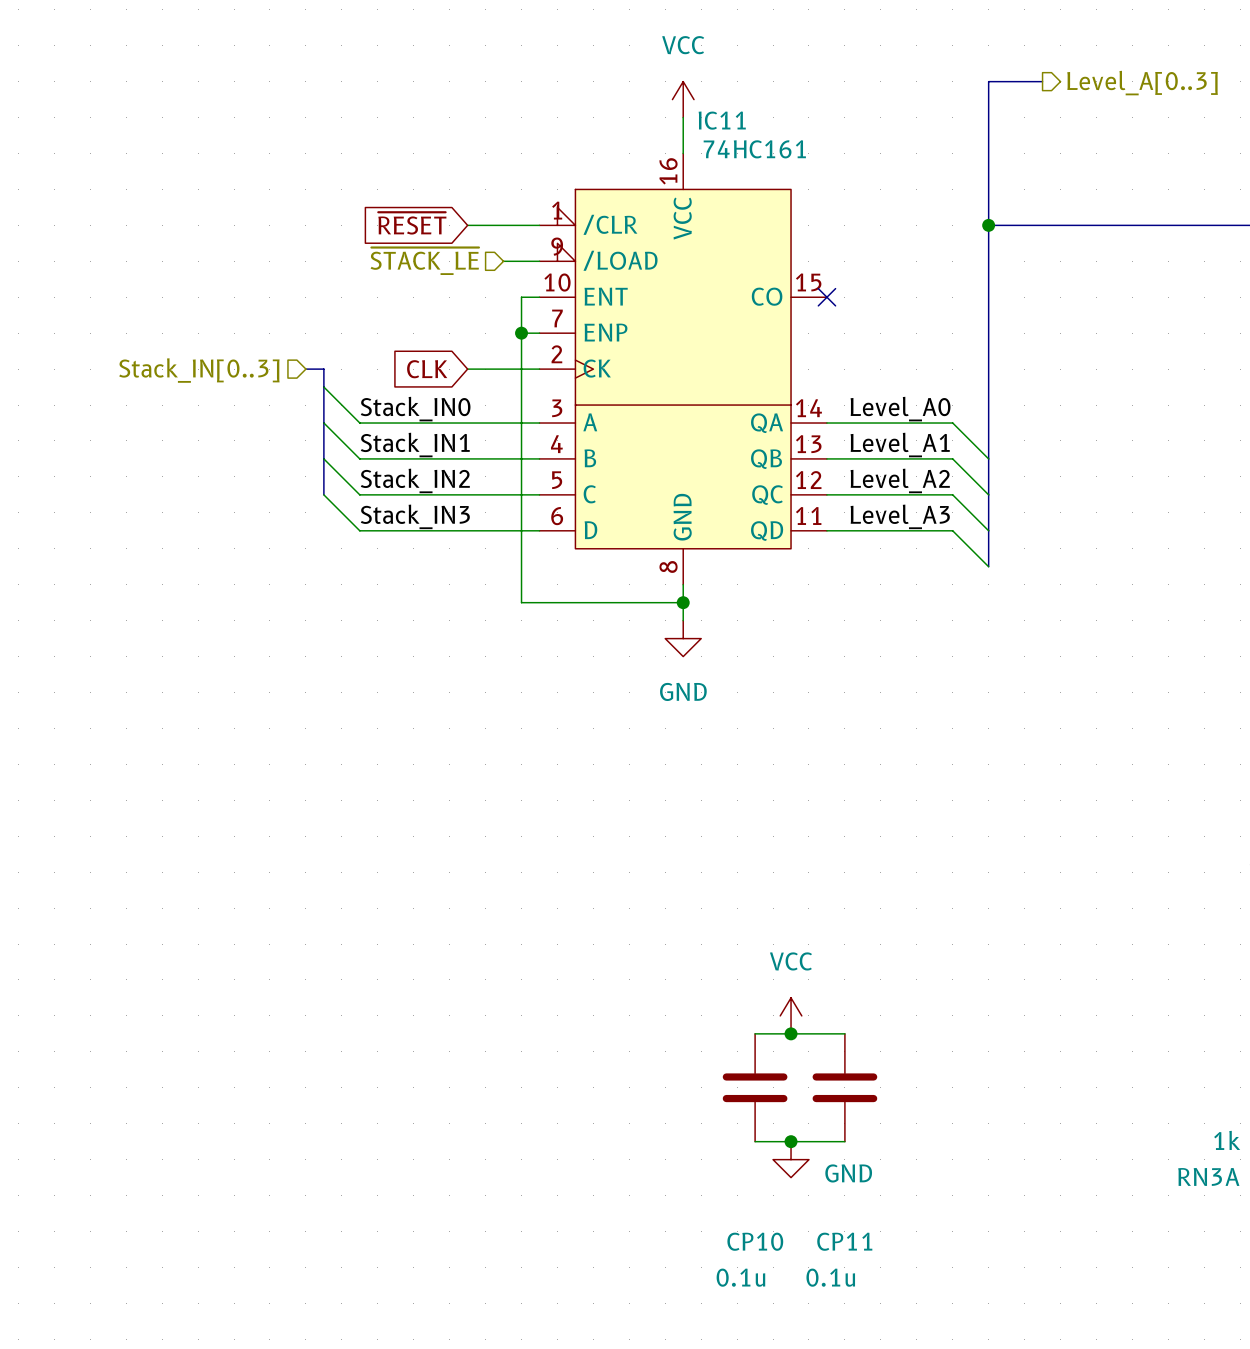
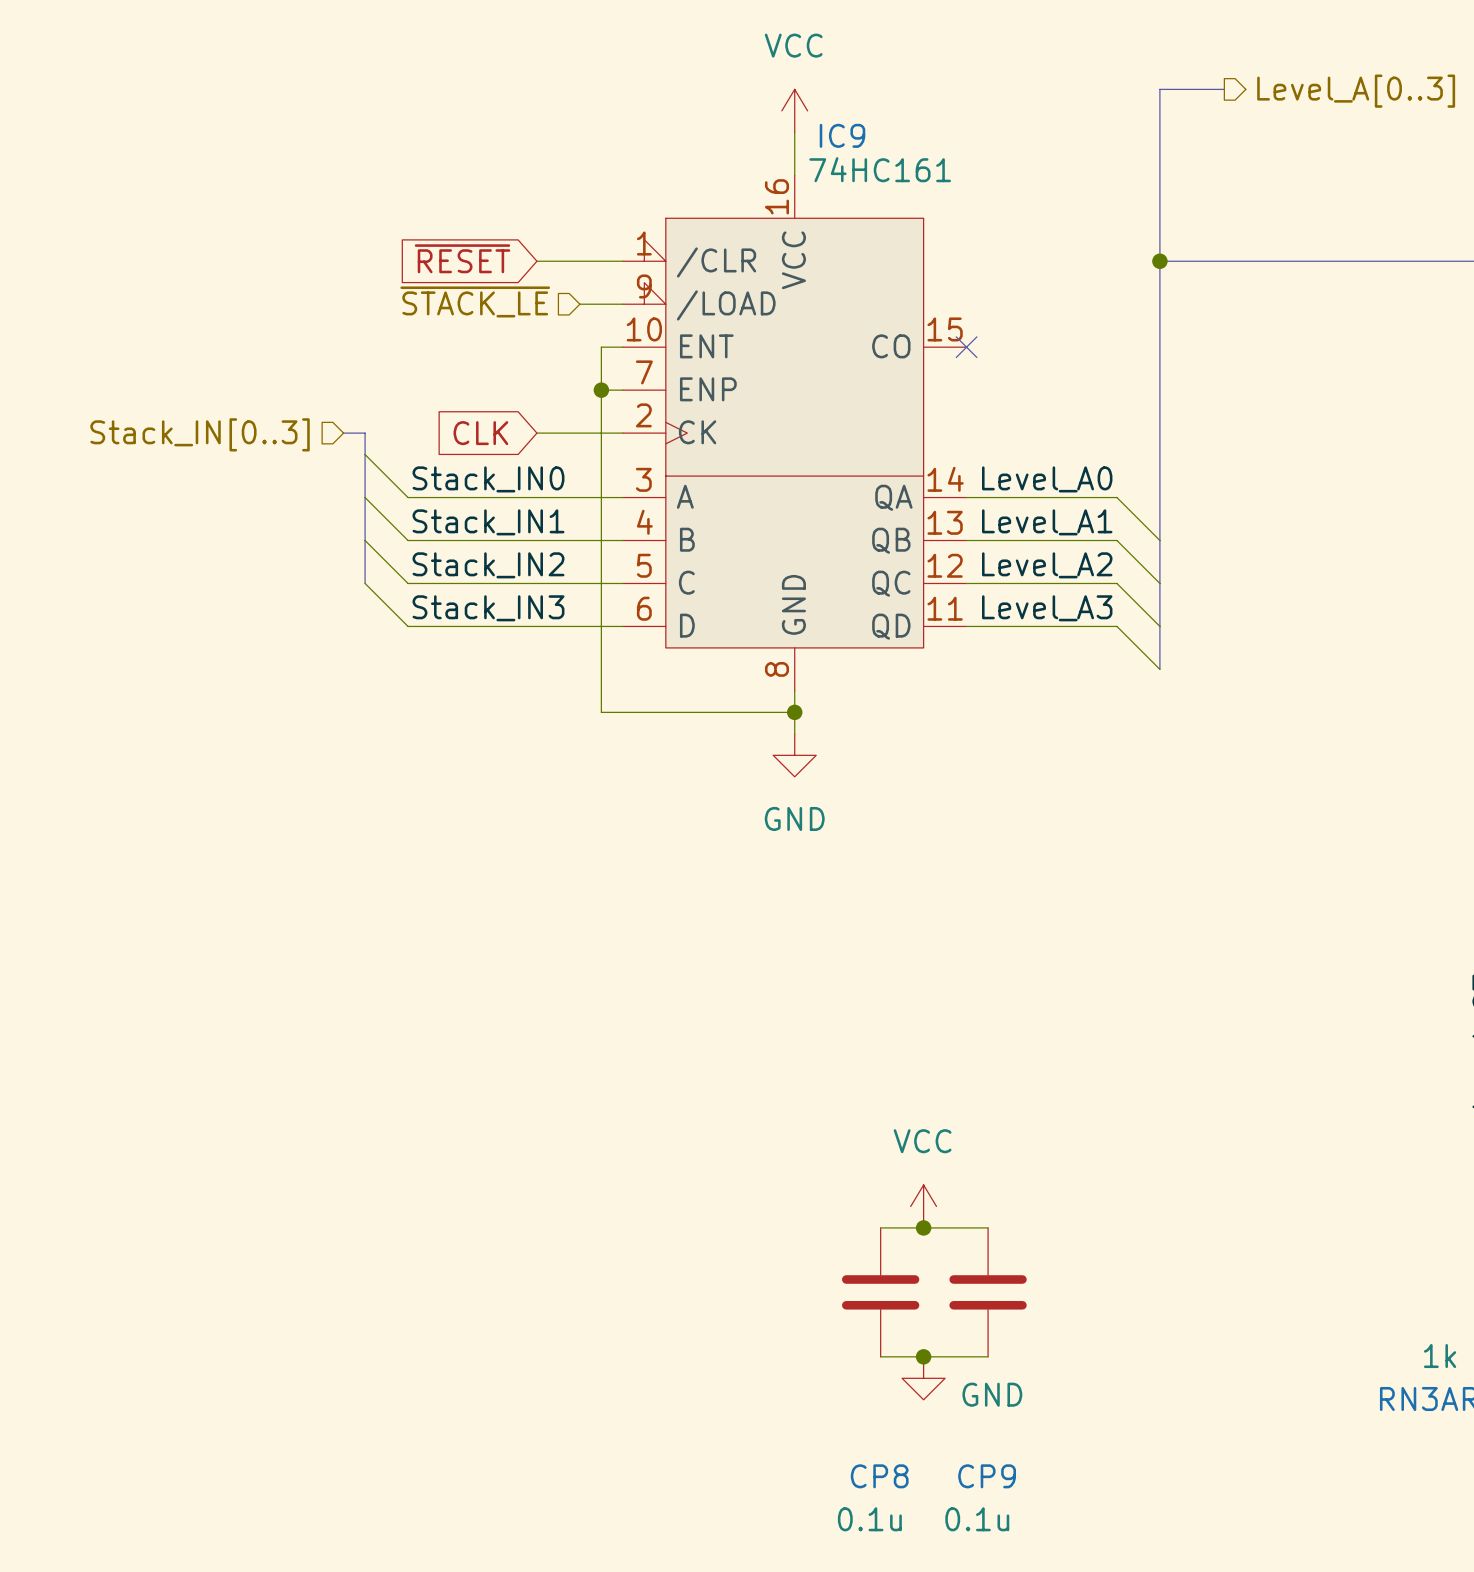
IC11 name: IC11 (722, 120) -> IC9 (842, 135)
CP10 name: CP10 (755, 1241) -> CP8 (879, 1476)
CP11 name: CP11 (844, 1241) -> CP9 (987, 1476)

